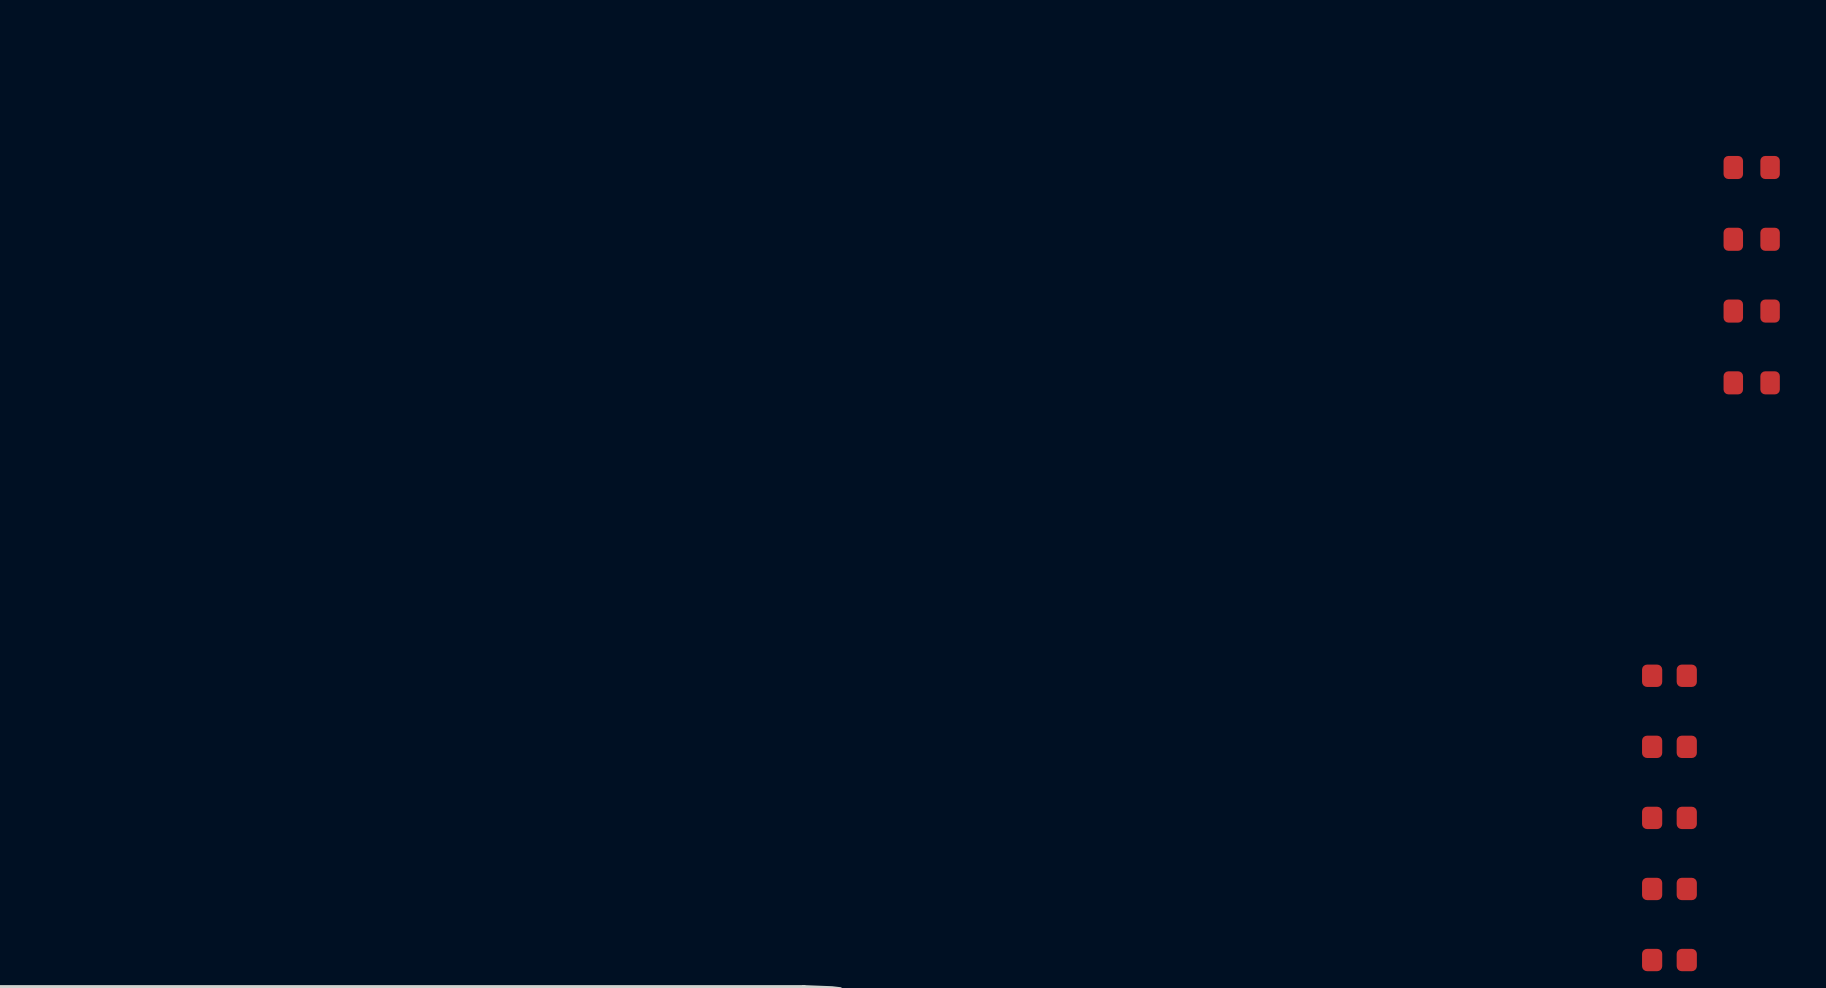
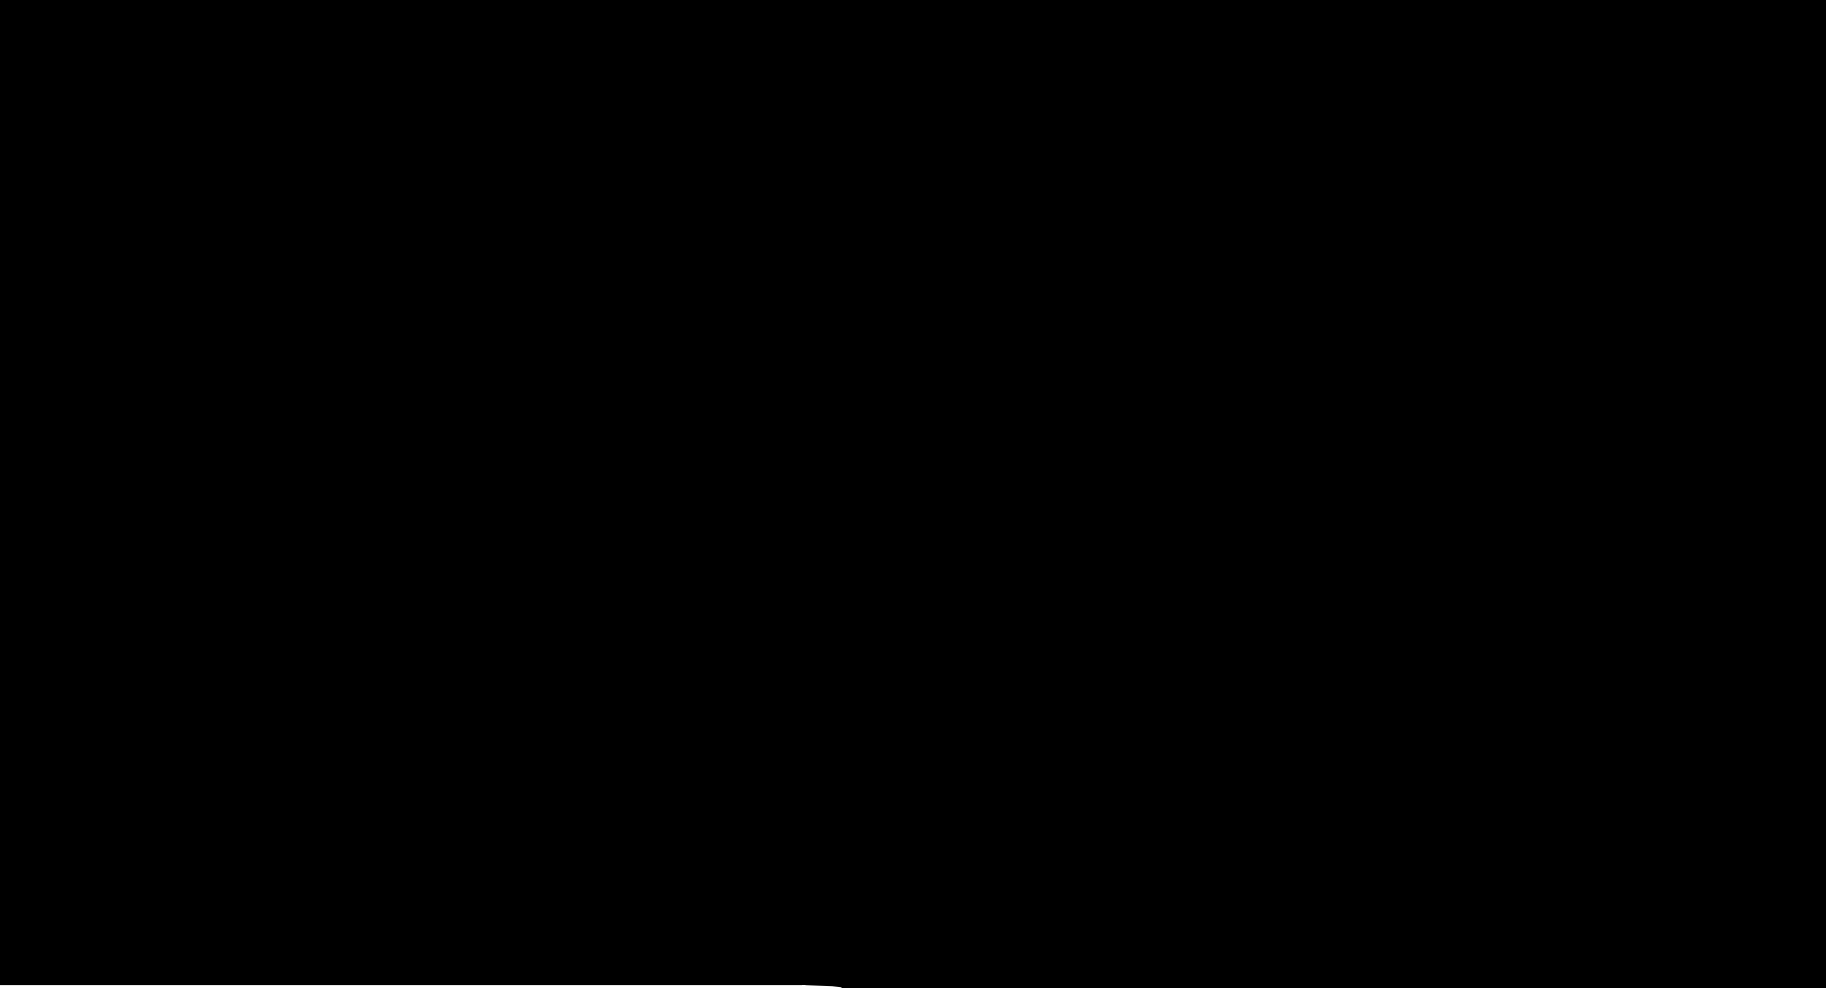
part: (1751, 167) -> none
part: (1751, 239) -> none
part: (1751, 311) -> none
part: (1751, 382) -> none
part: (1669, 675) -> none
part: (1669, 746) -> none
part: (1669, 817) -> none
part: (1669, 888) -> none
part: (1669, 960) -> none

